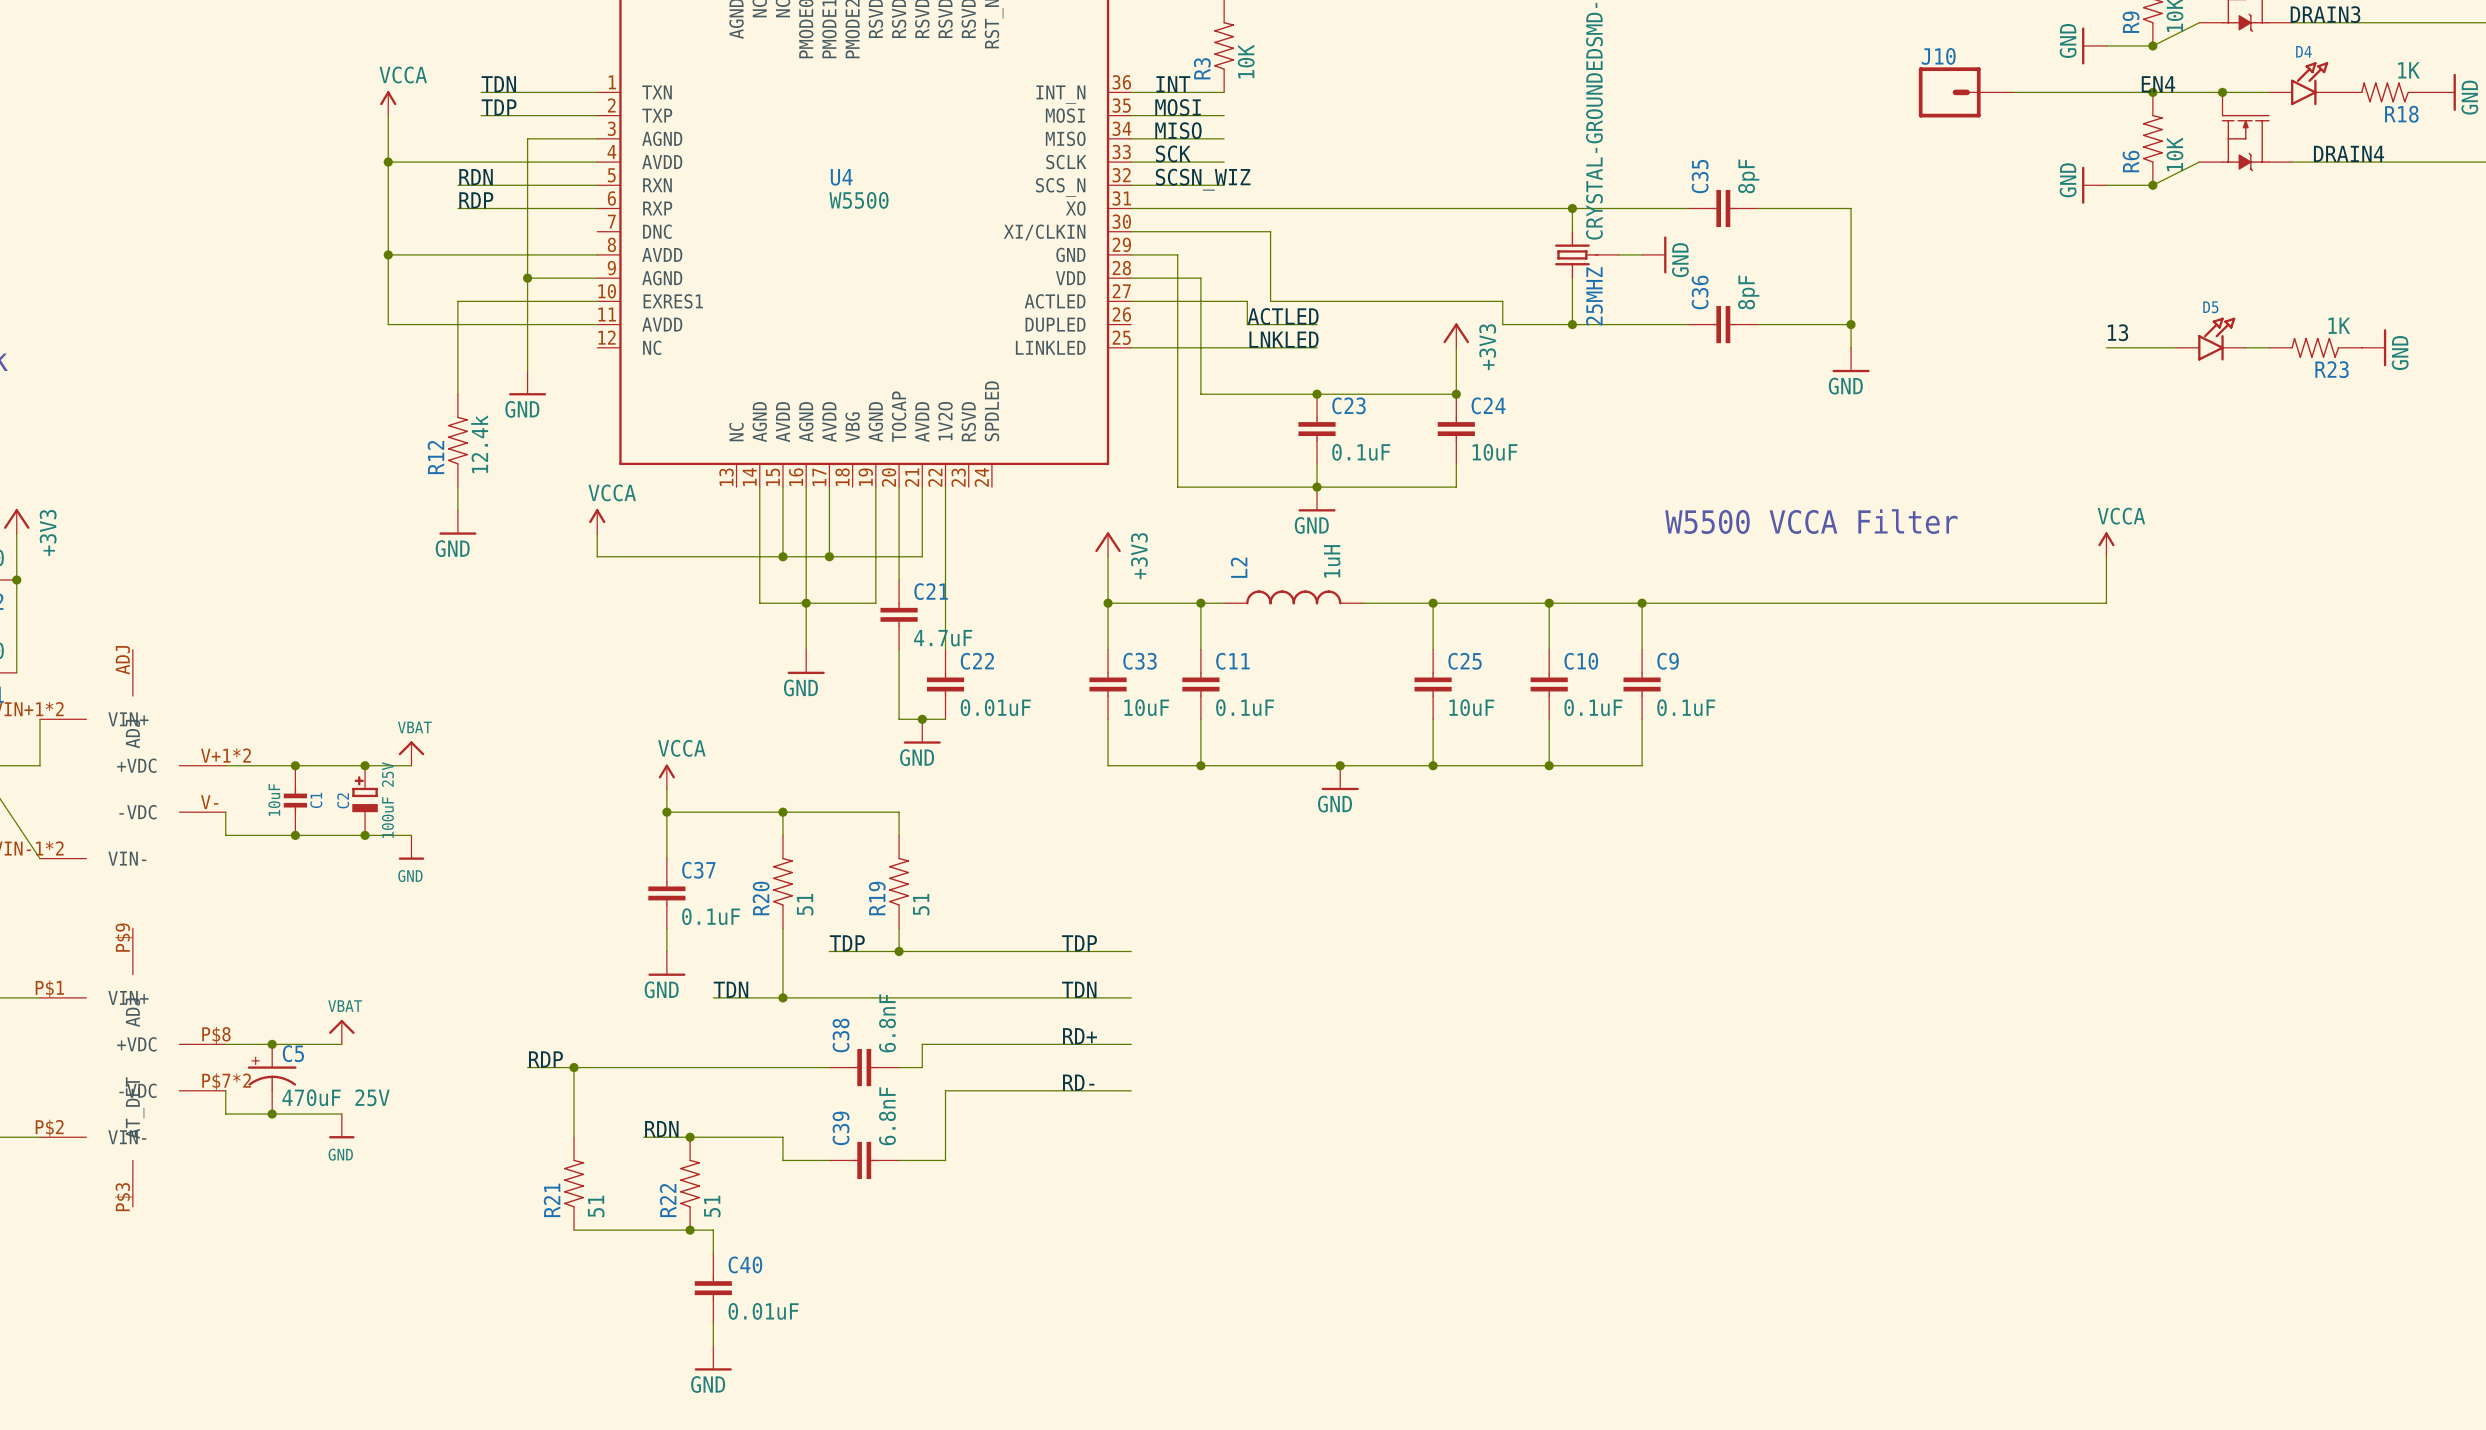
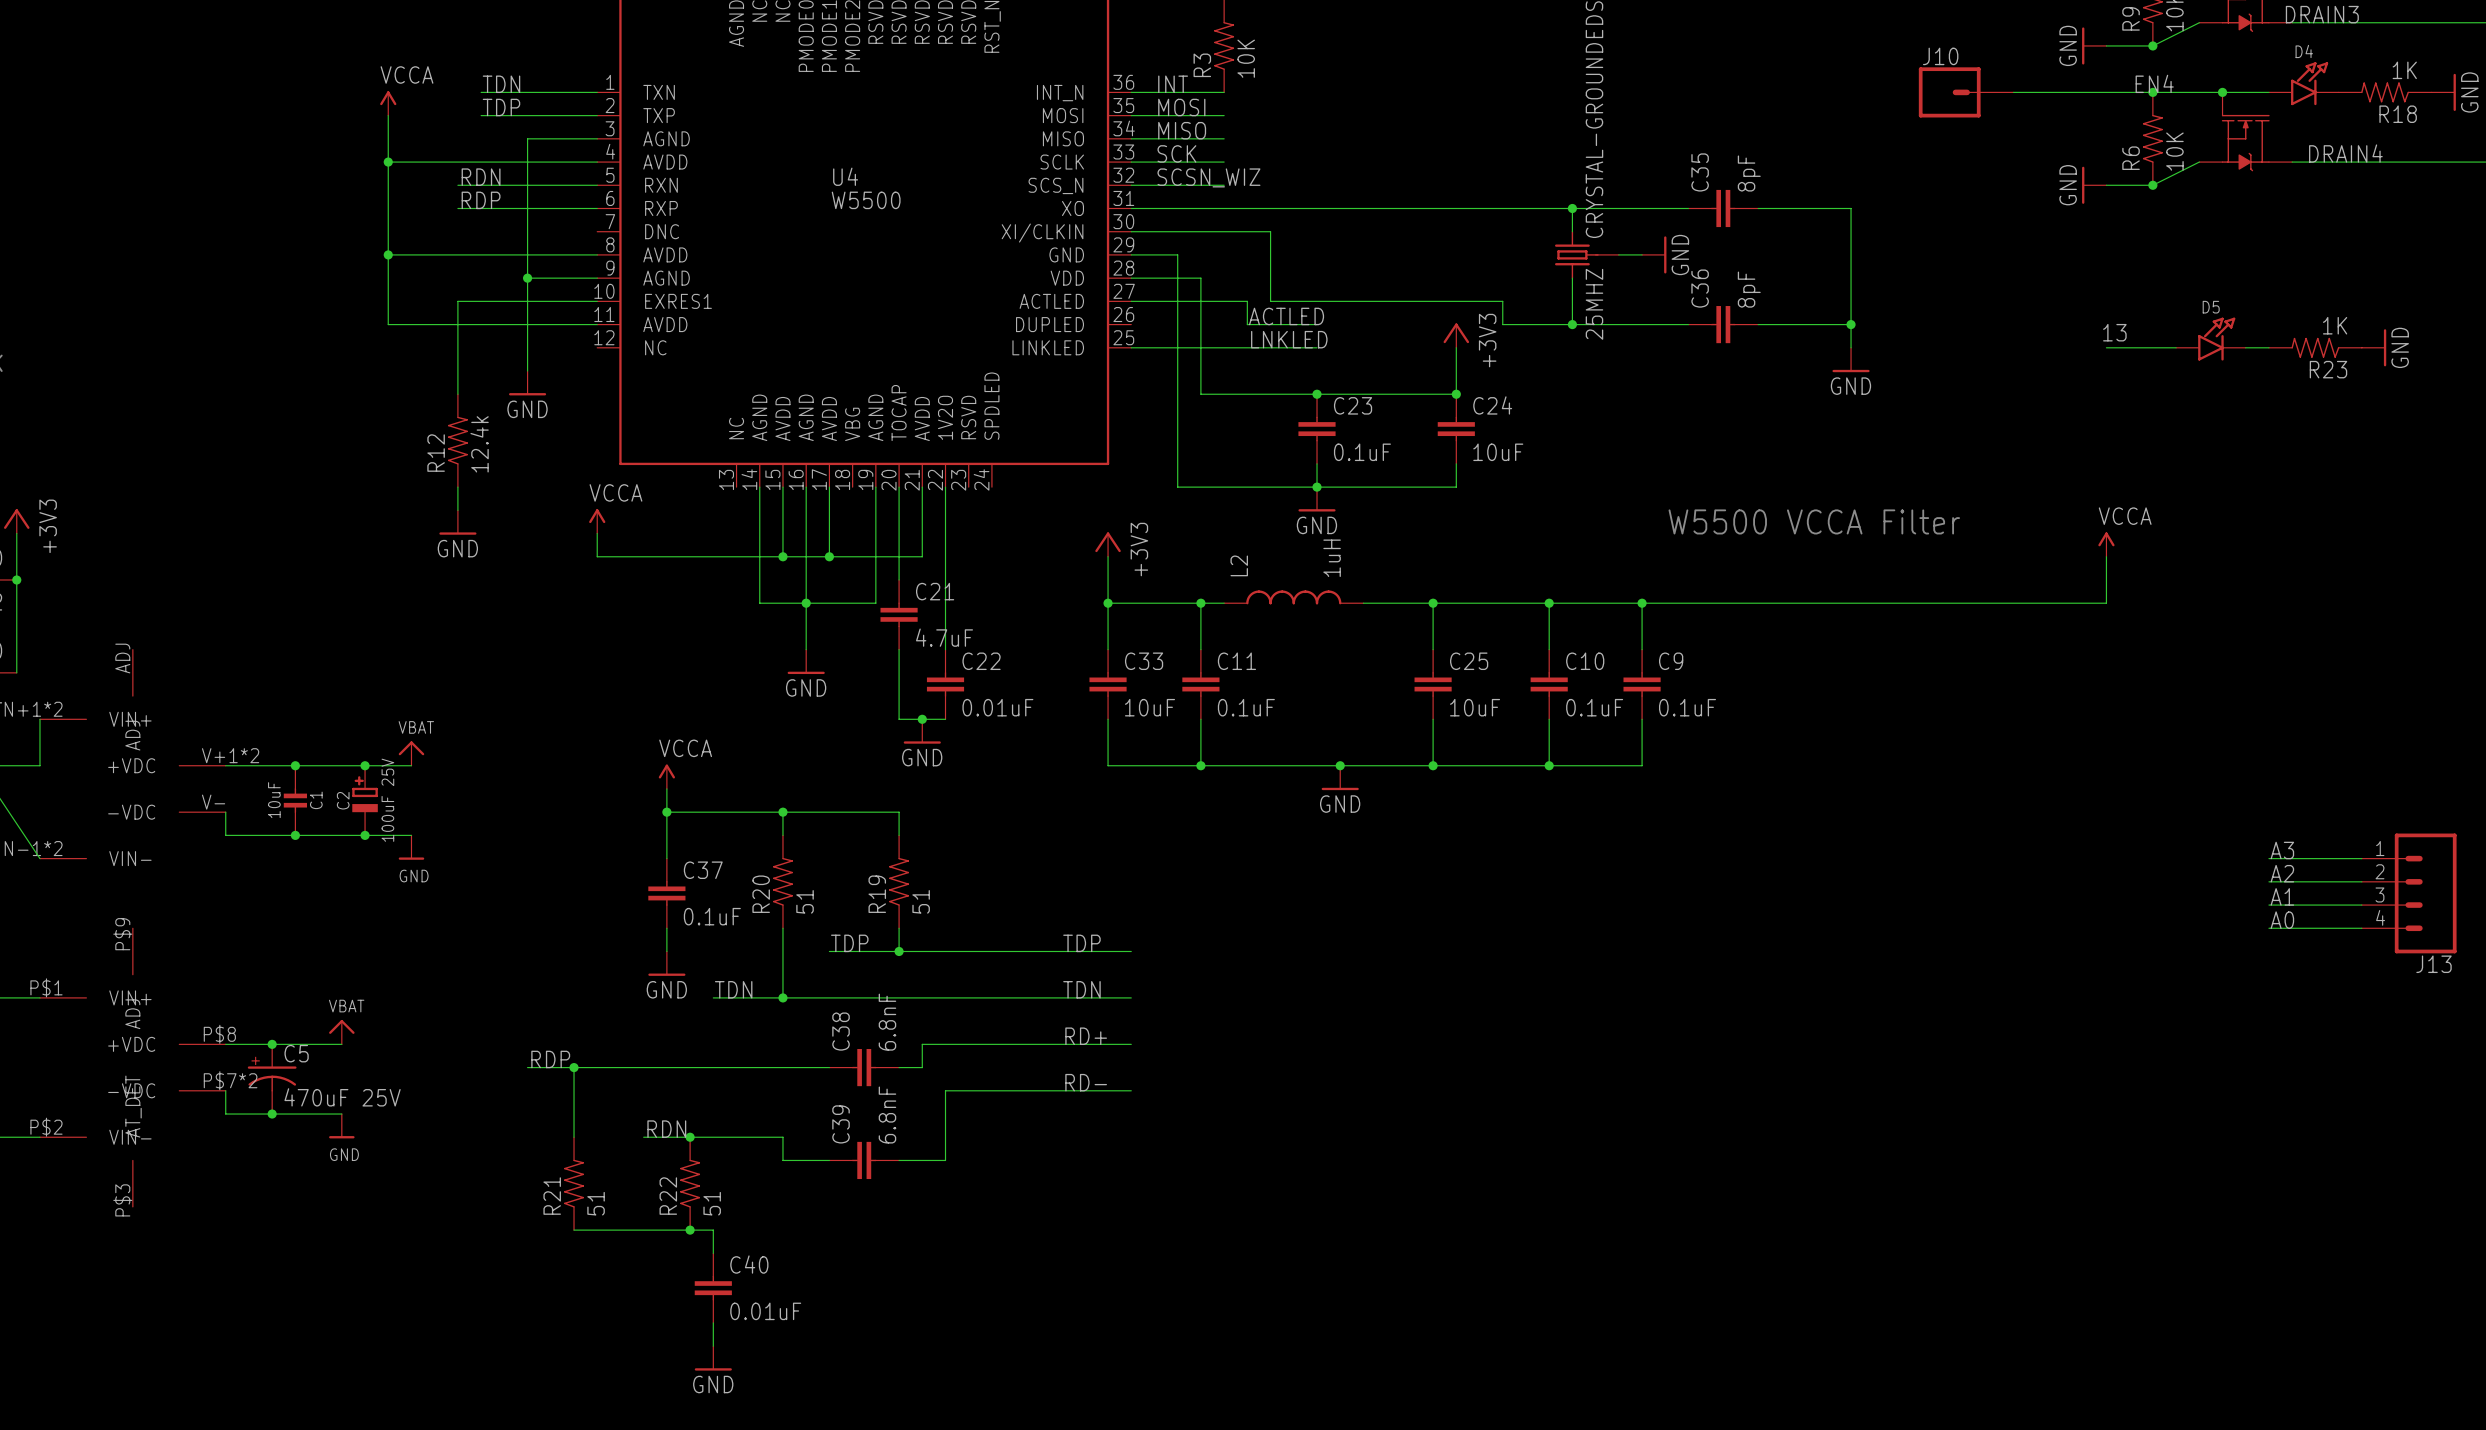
label: none -> A3 (2282, 850)
wire: none -> (2268, 858) (2361, 858)
label: none -> A2 (2282, 873)
wire: none -> (2268, 881) (2361, 881)
J13: none -> (2409, 893)
label: none -> A1 (2282, 896)
wire: none -> (2268, 905) (2361, 905)
label: none -> A0 (2282, 920)
wire: none -> (2268, 928) (2361, 928)

